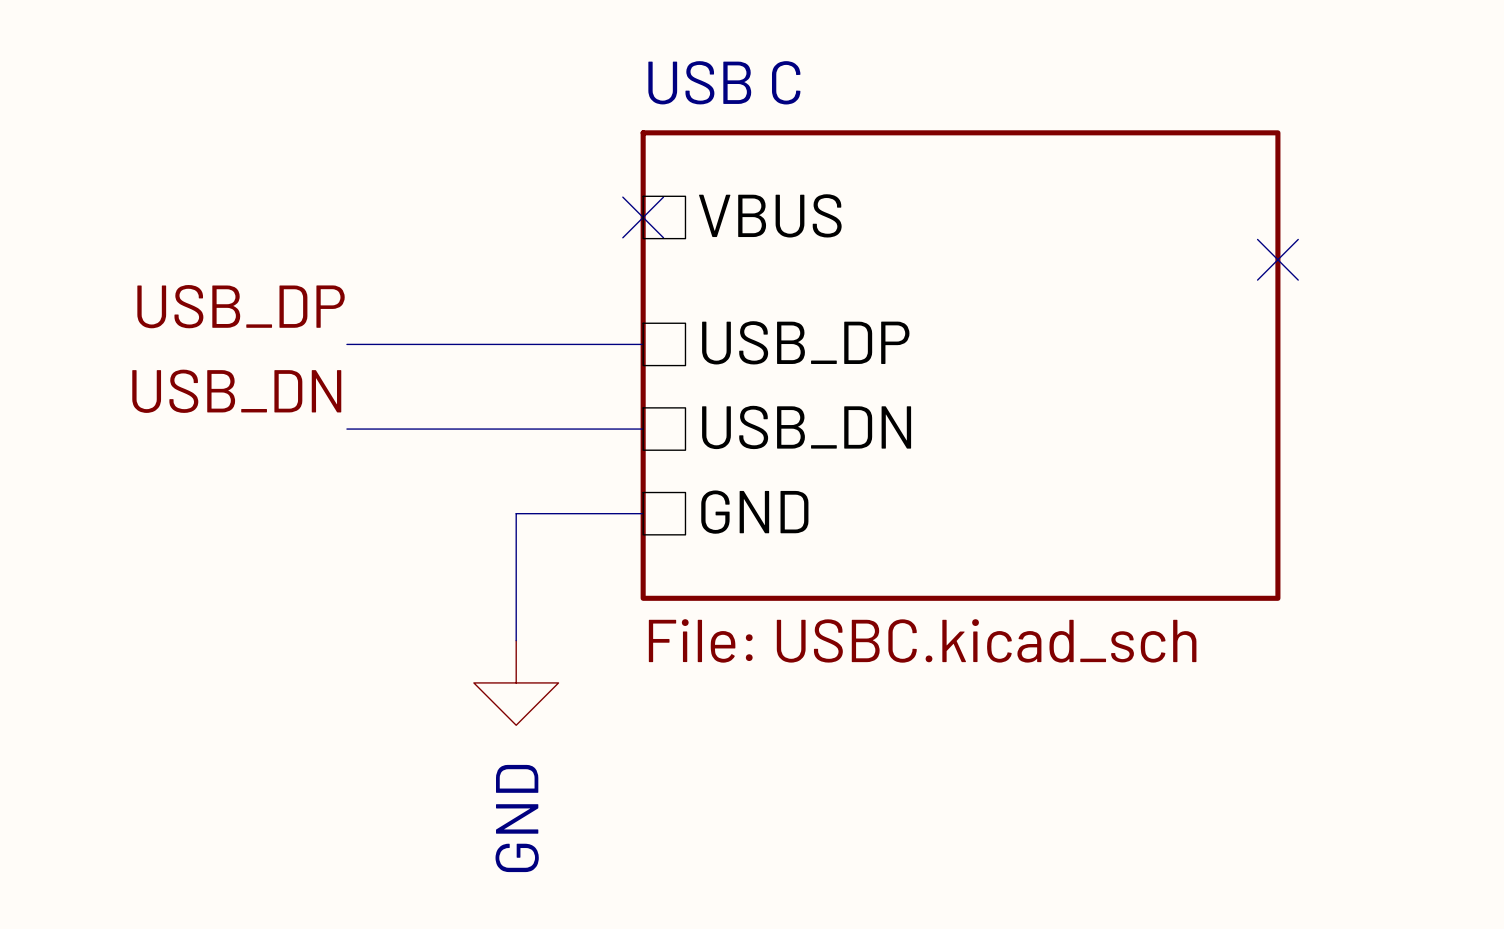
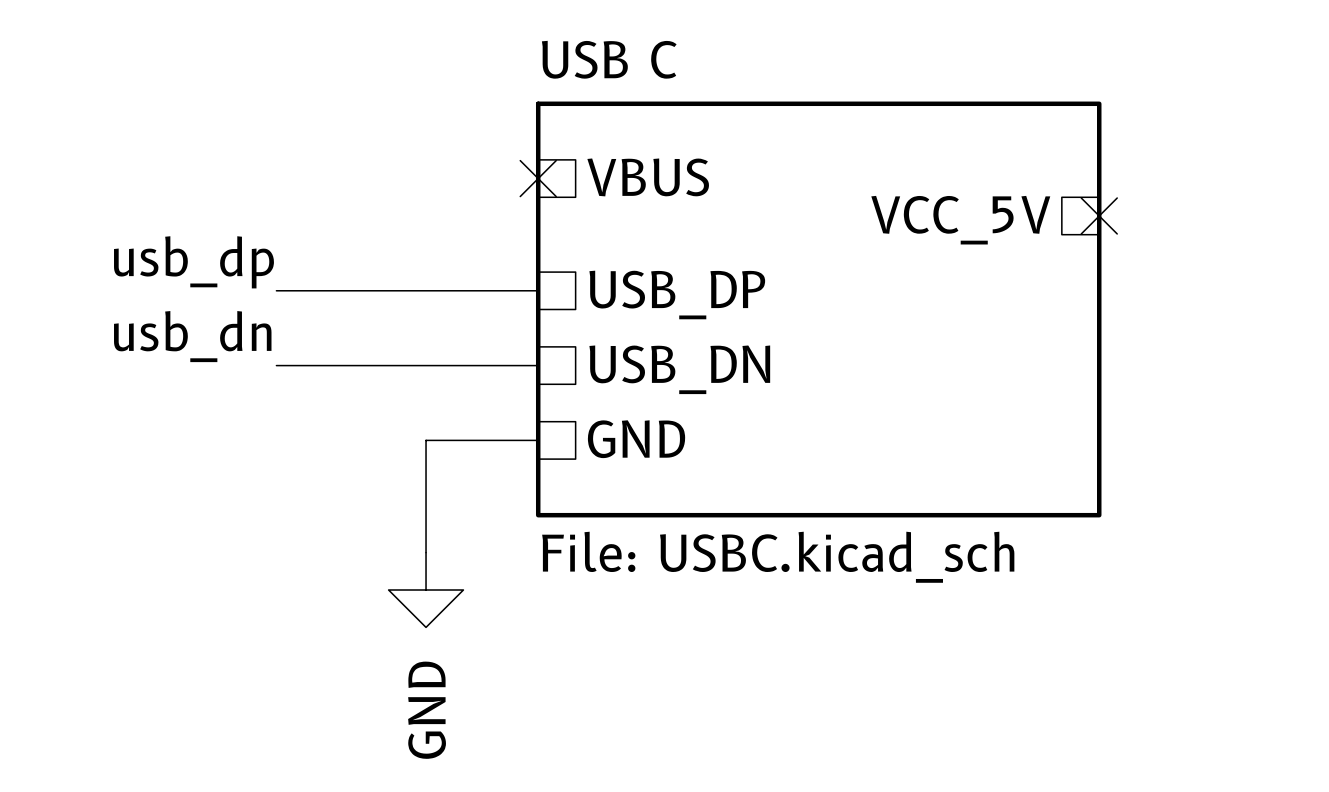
sheet pin: none -> VCC_5V (960, 220)
label: USB_DP (241, 306) -> usb_dp (193, 262)
label: USB_DN (236, 391) -> usb_dn (192, 336)

